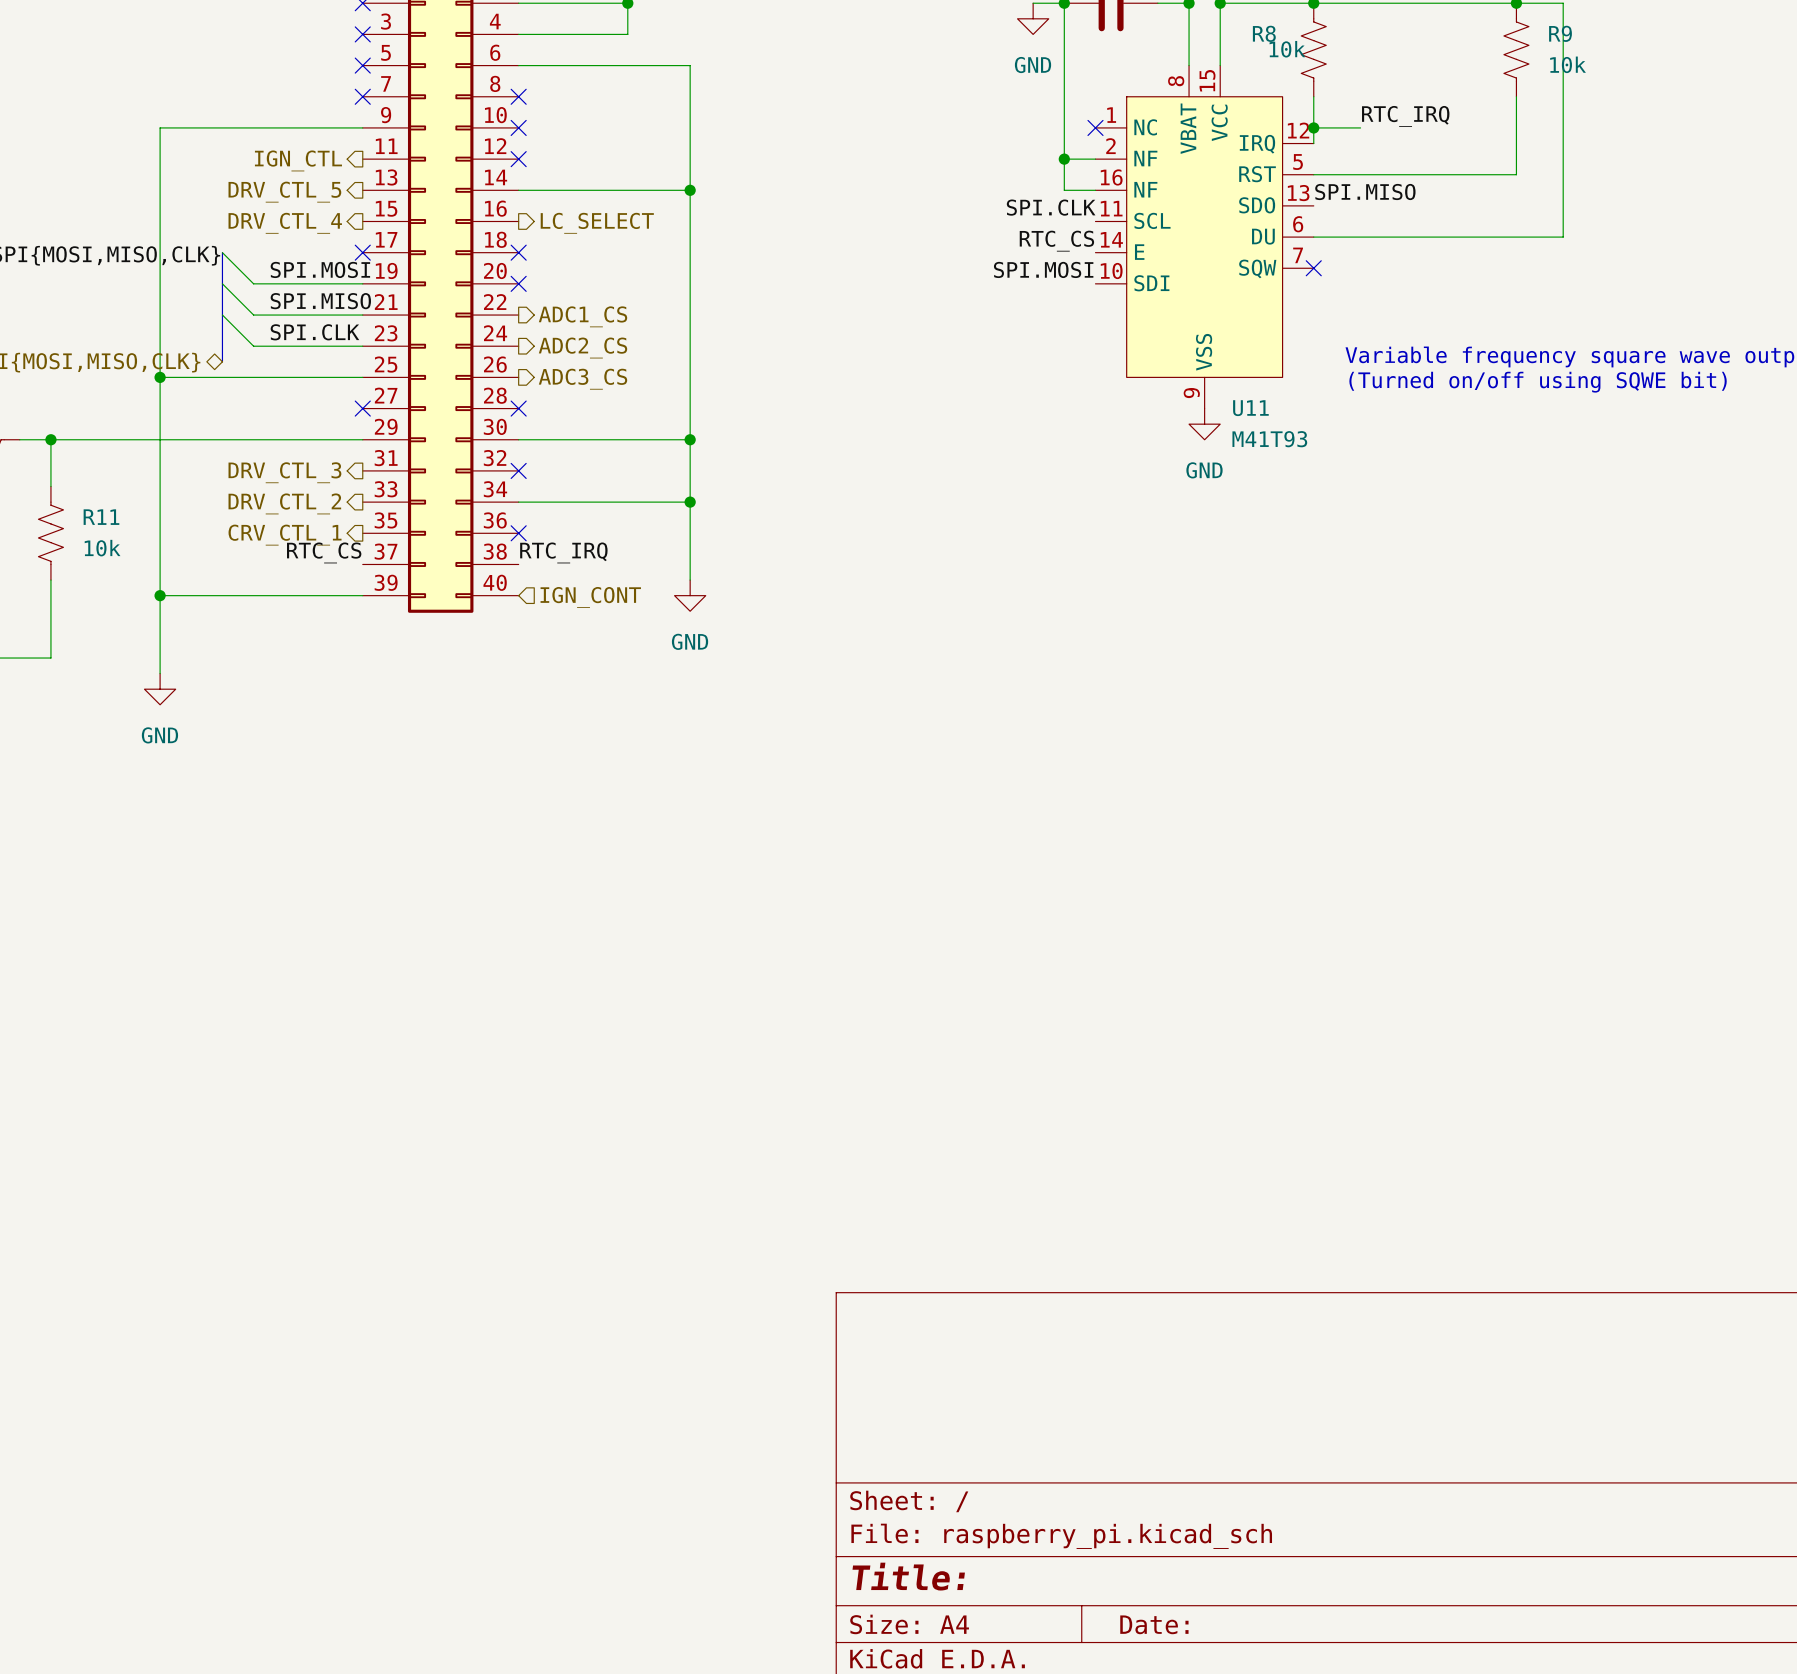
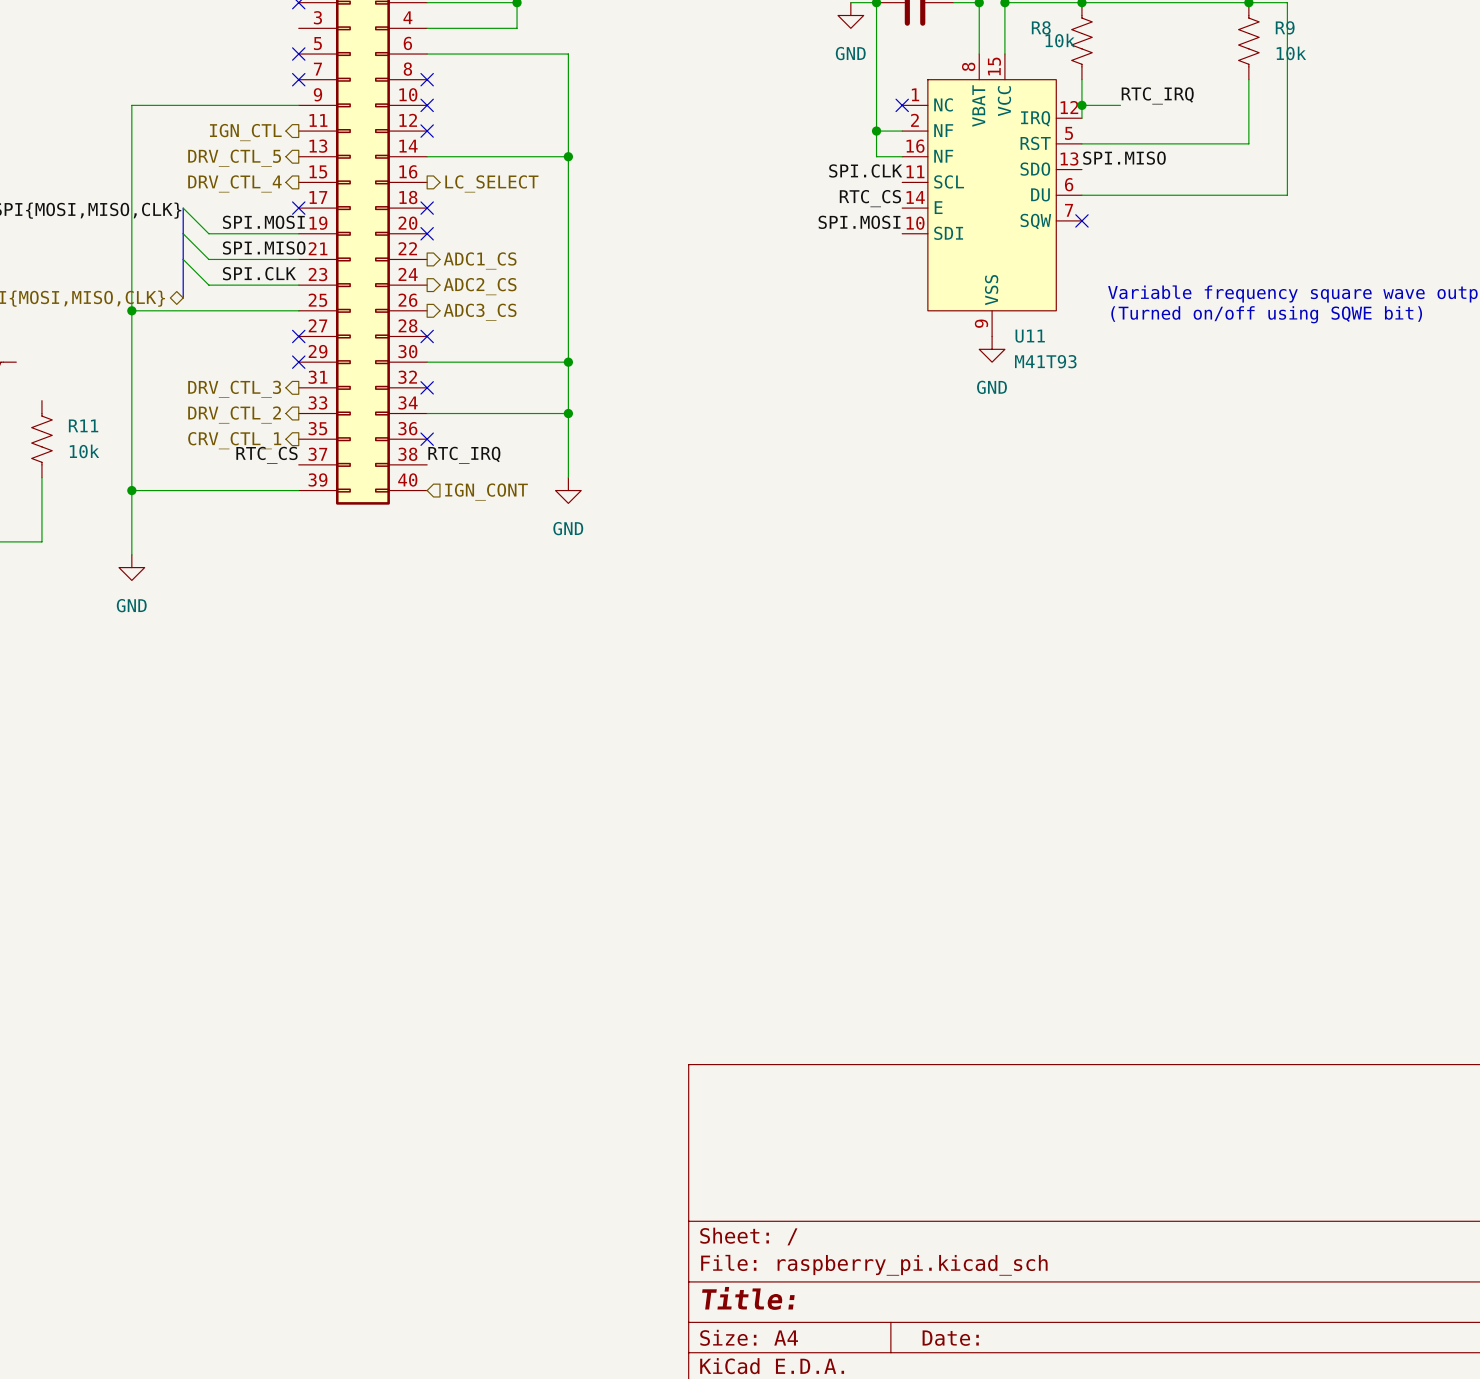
no-connect mark: (362, 34) -> none
wire: (19, 439) (362, 439) -> none
wire: (50, 439) (50, 486) -> none
junction: (50, 439) -> none
no-connect mark: none -> (298, 362)

